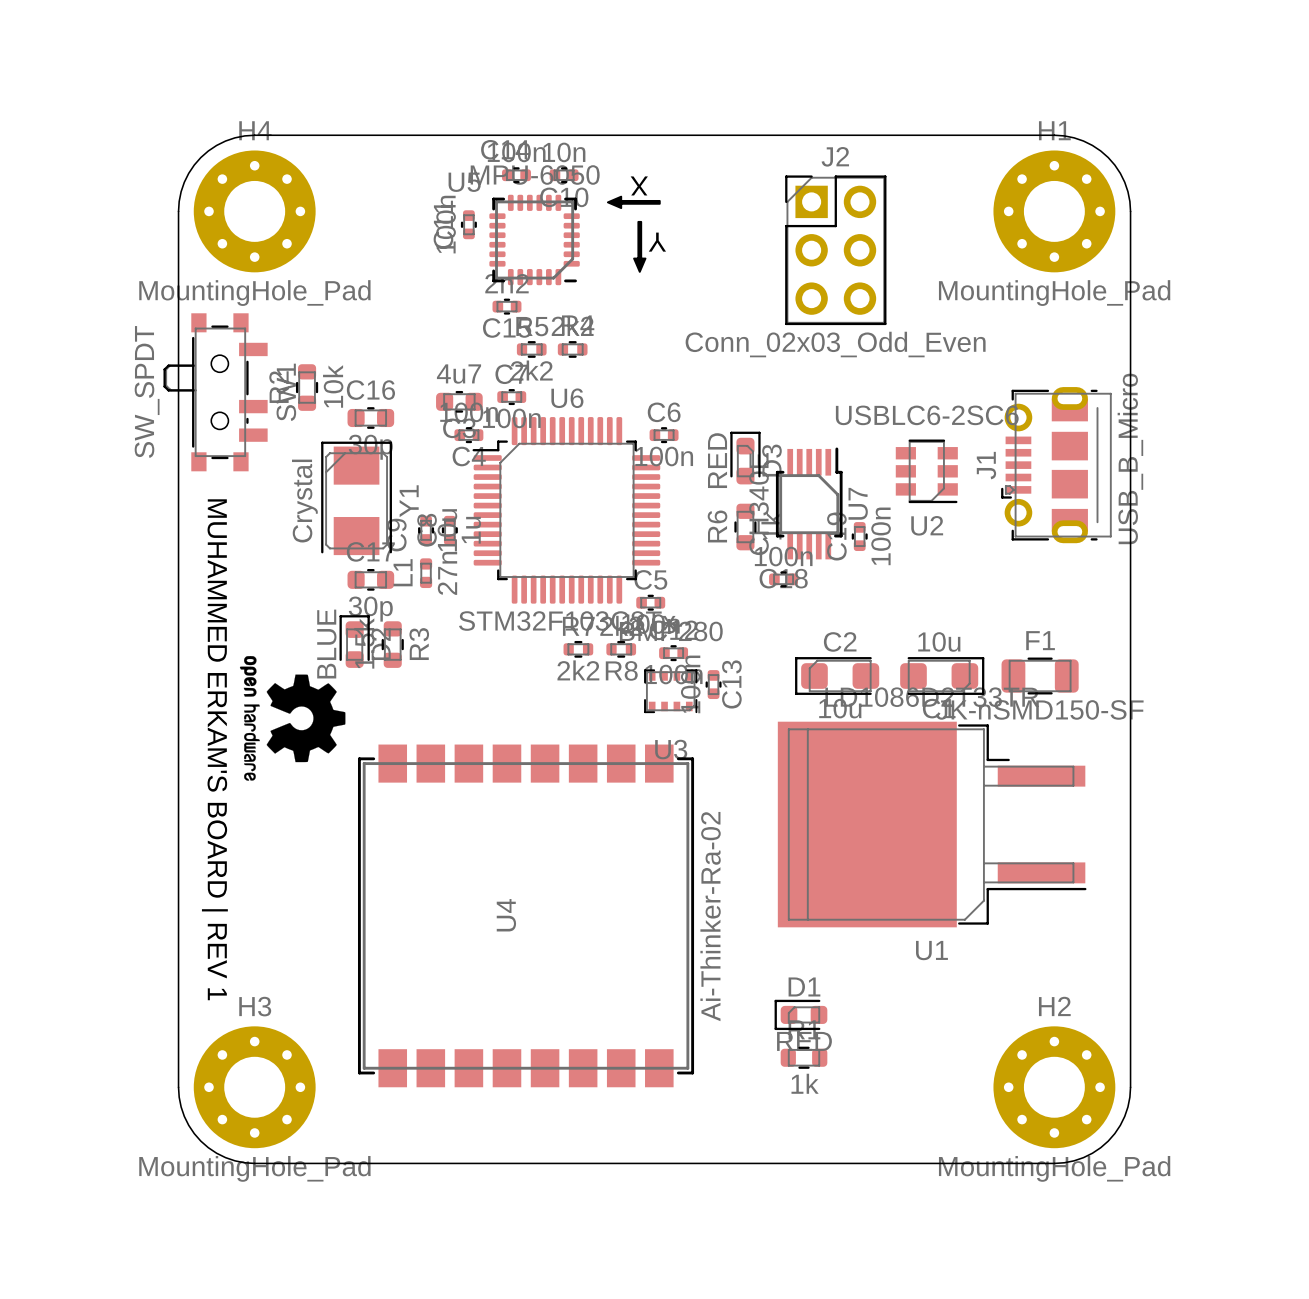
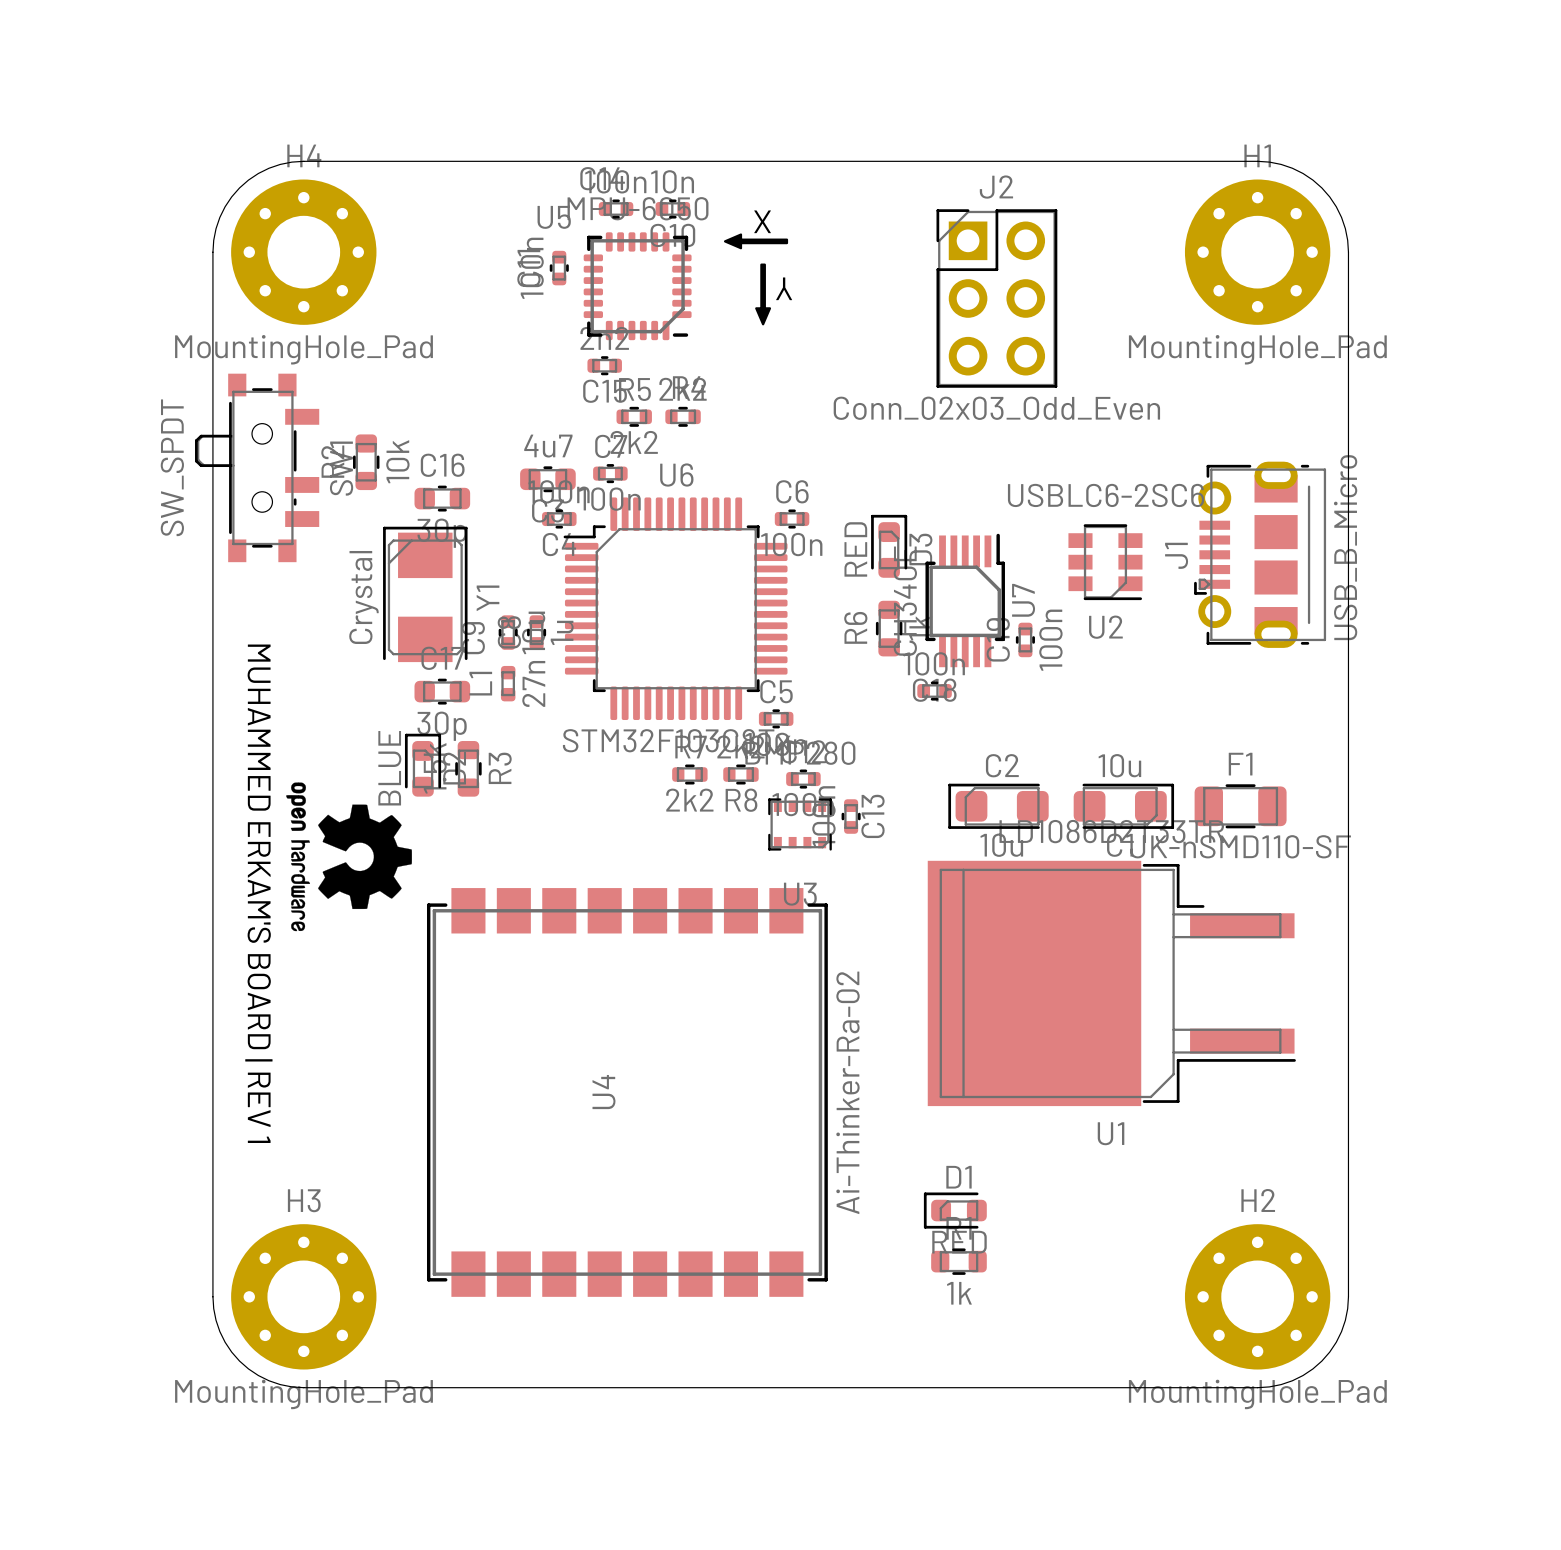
F1 value: JK-nSMD150-SF (1039, 709) -> JK-nSMD110-SF (1240, 846)

